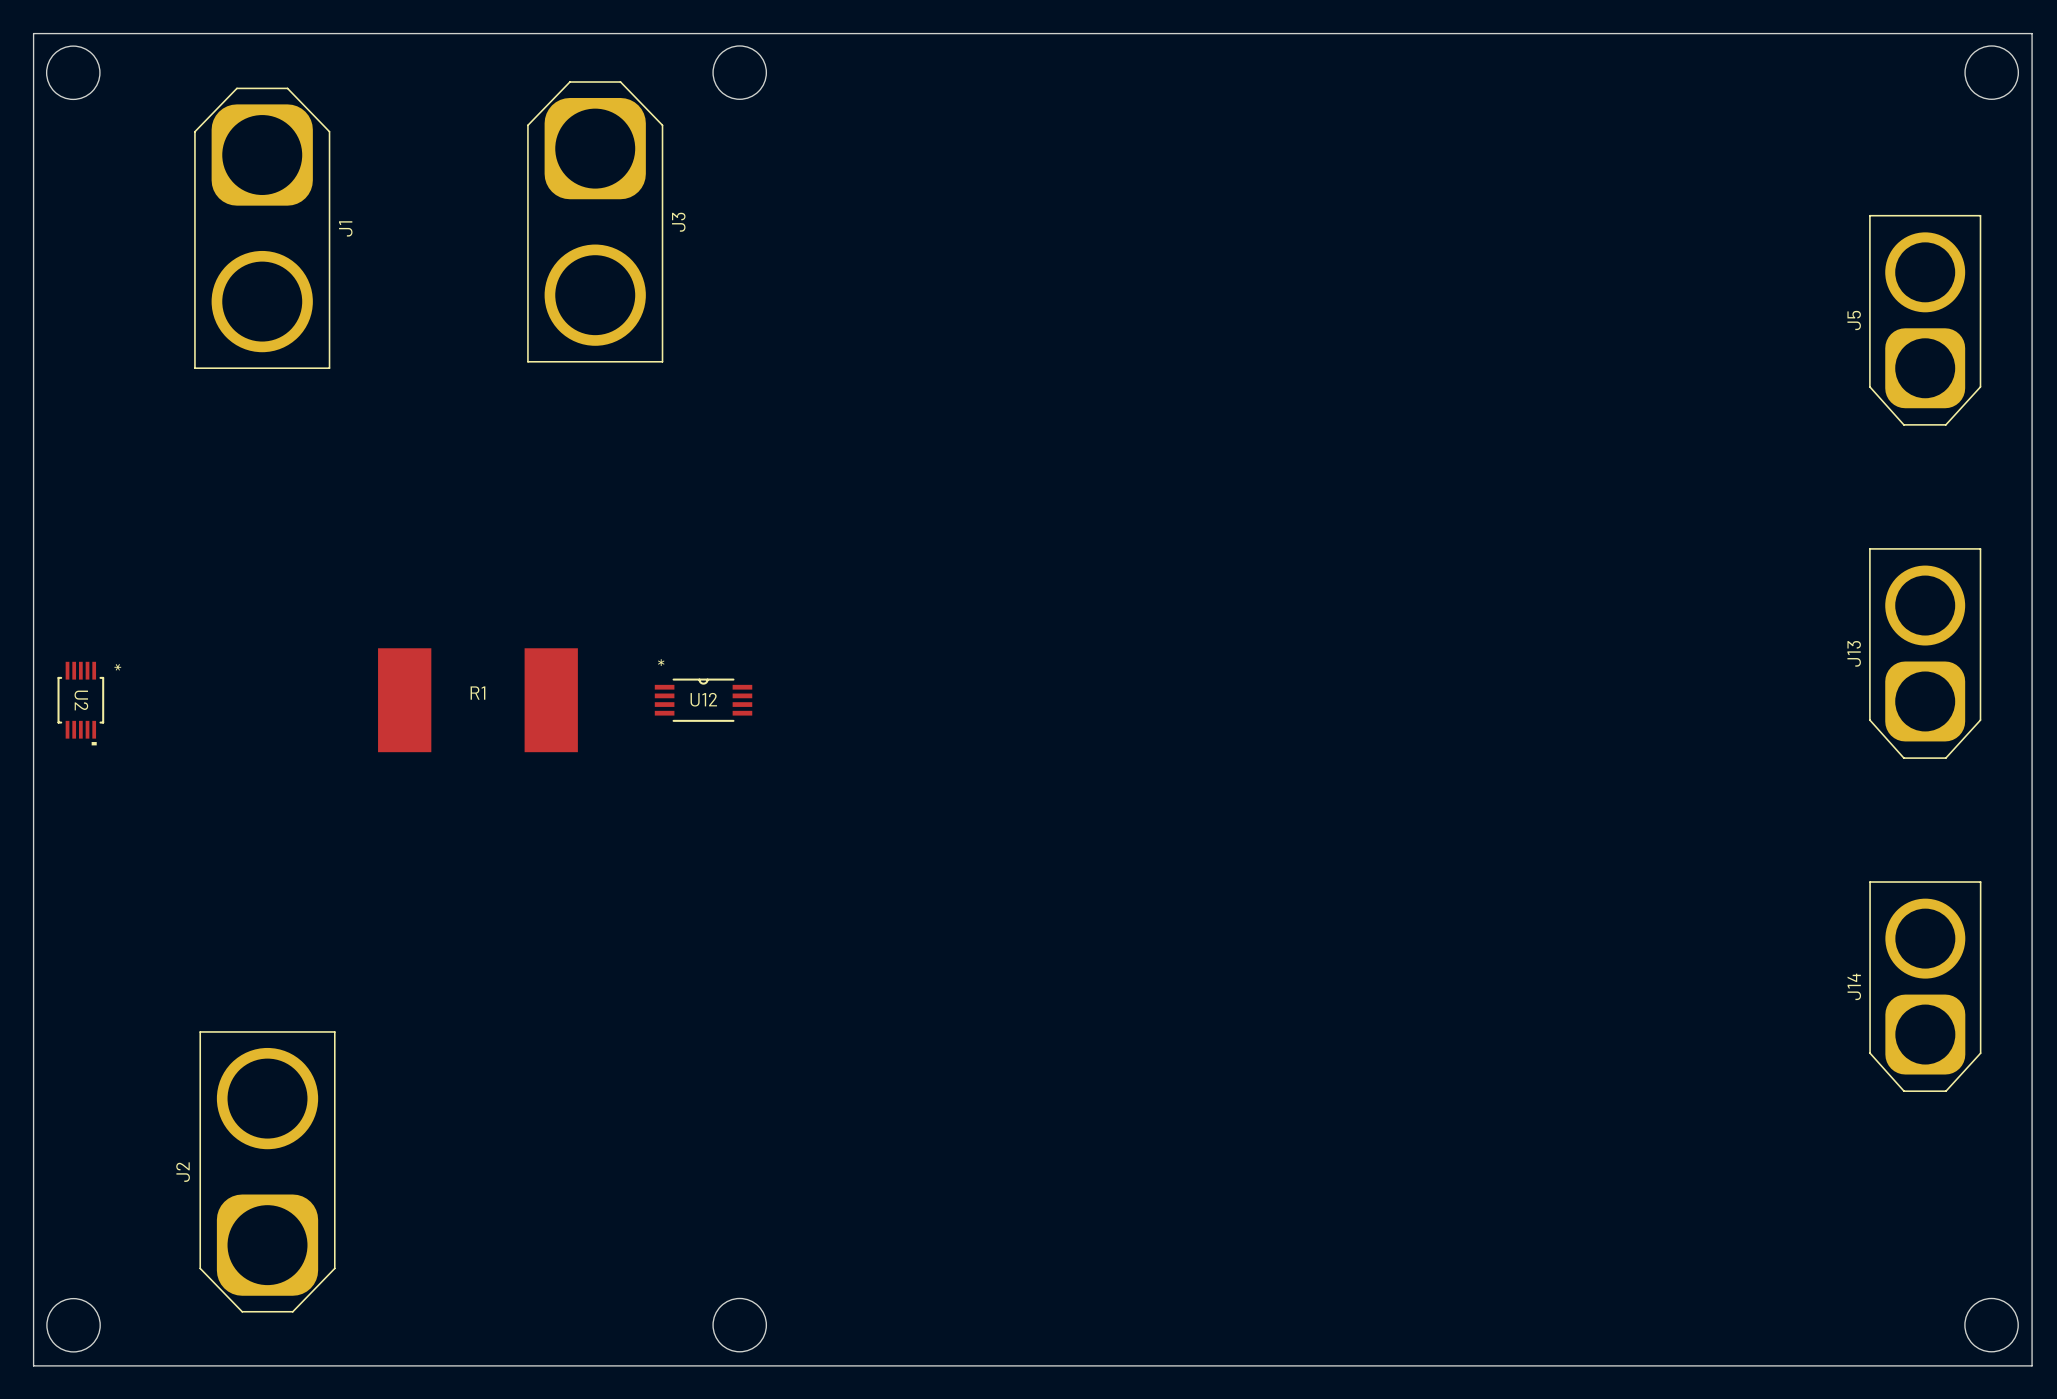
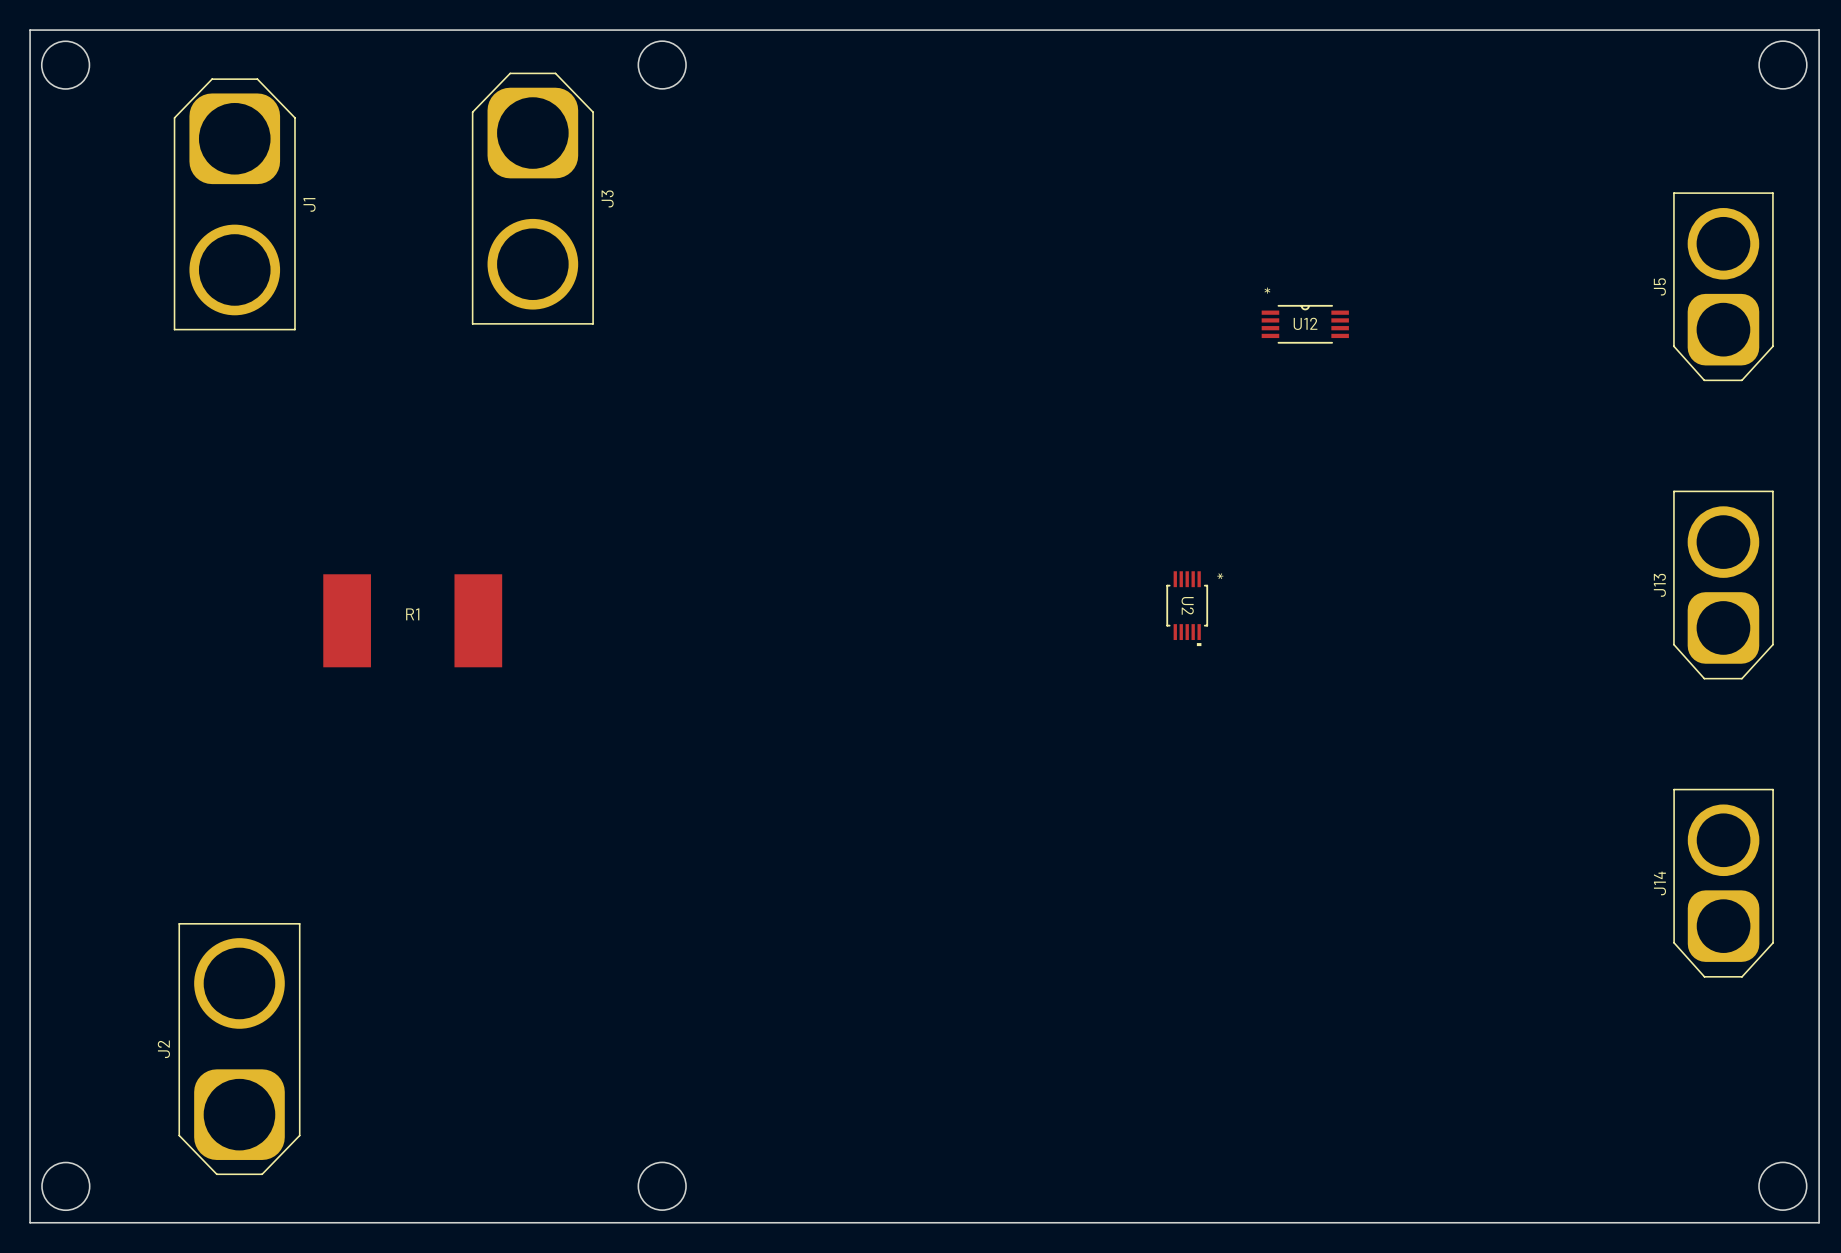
R1 position: (477, 700) -> (412, 620)
U12 position: (703, 700) -> (1305, 324)
U2 position: (80, 703) -> (1187, 608)

